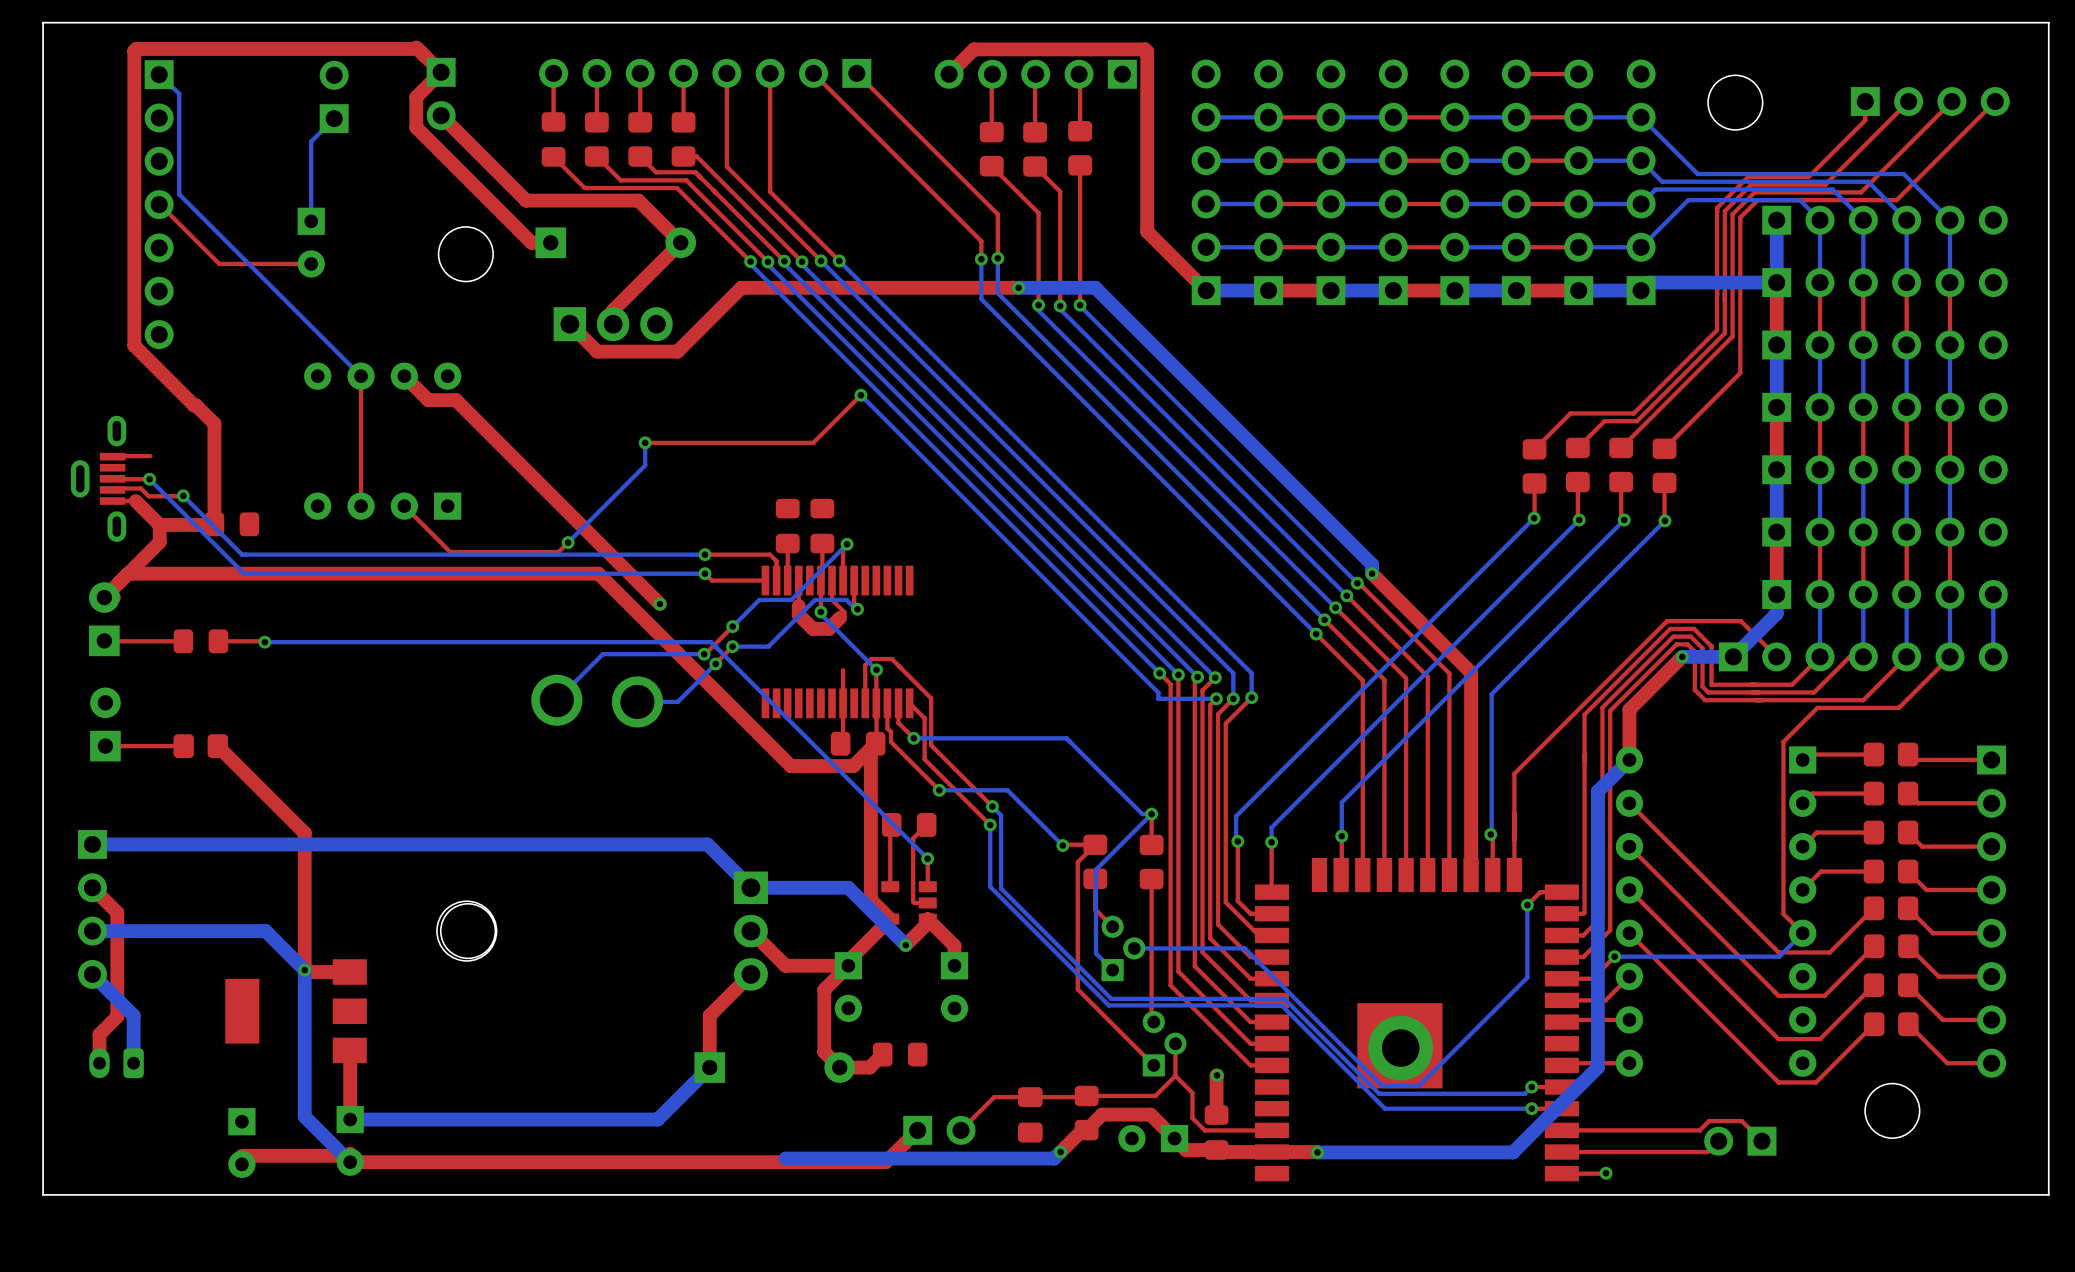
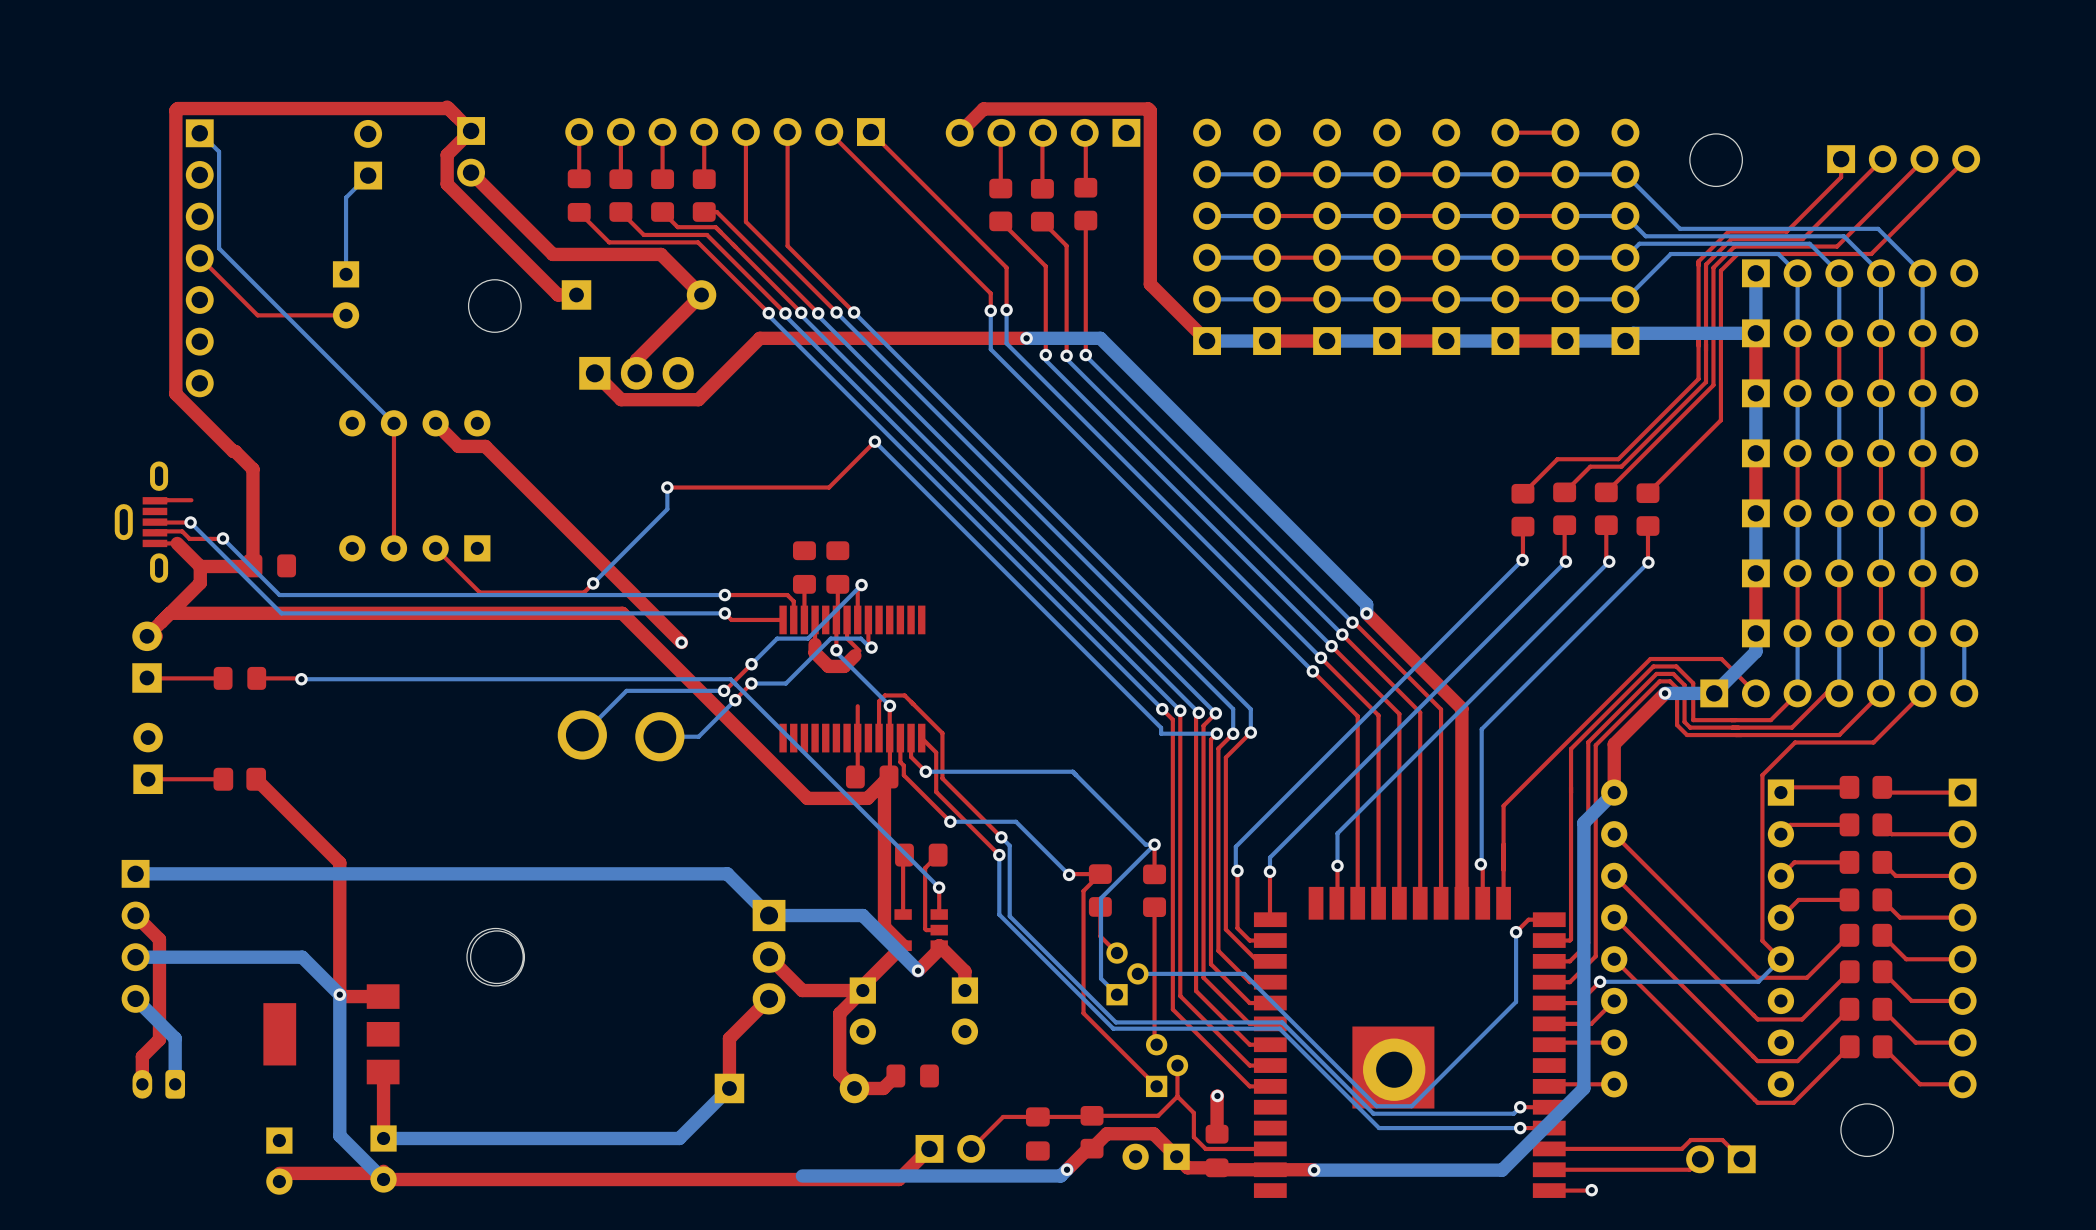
board edge: (2048, 22) (2048, 1194) (43, 1194) (43, 22) (2048, 22) -> none

